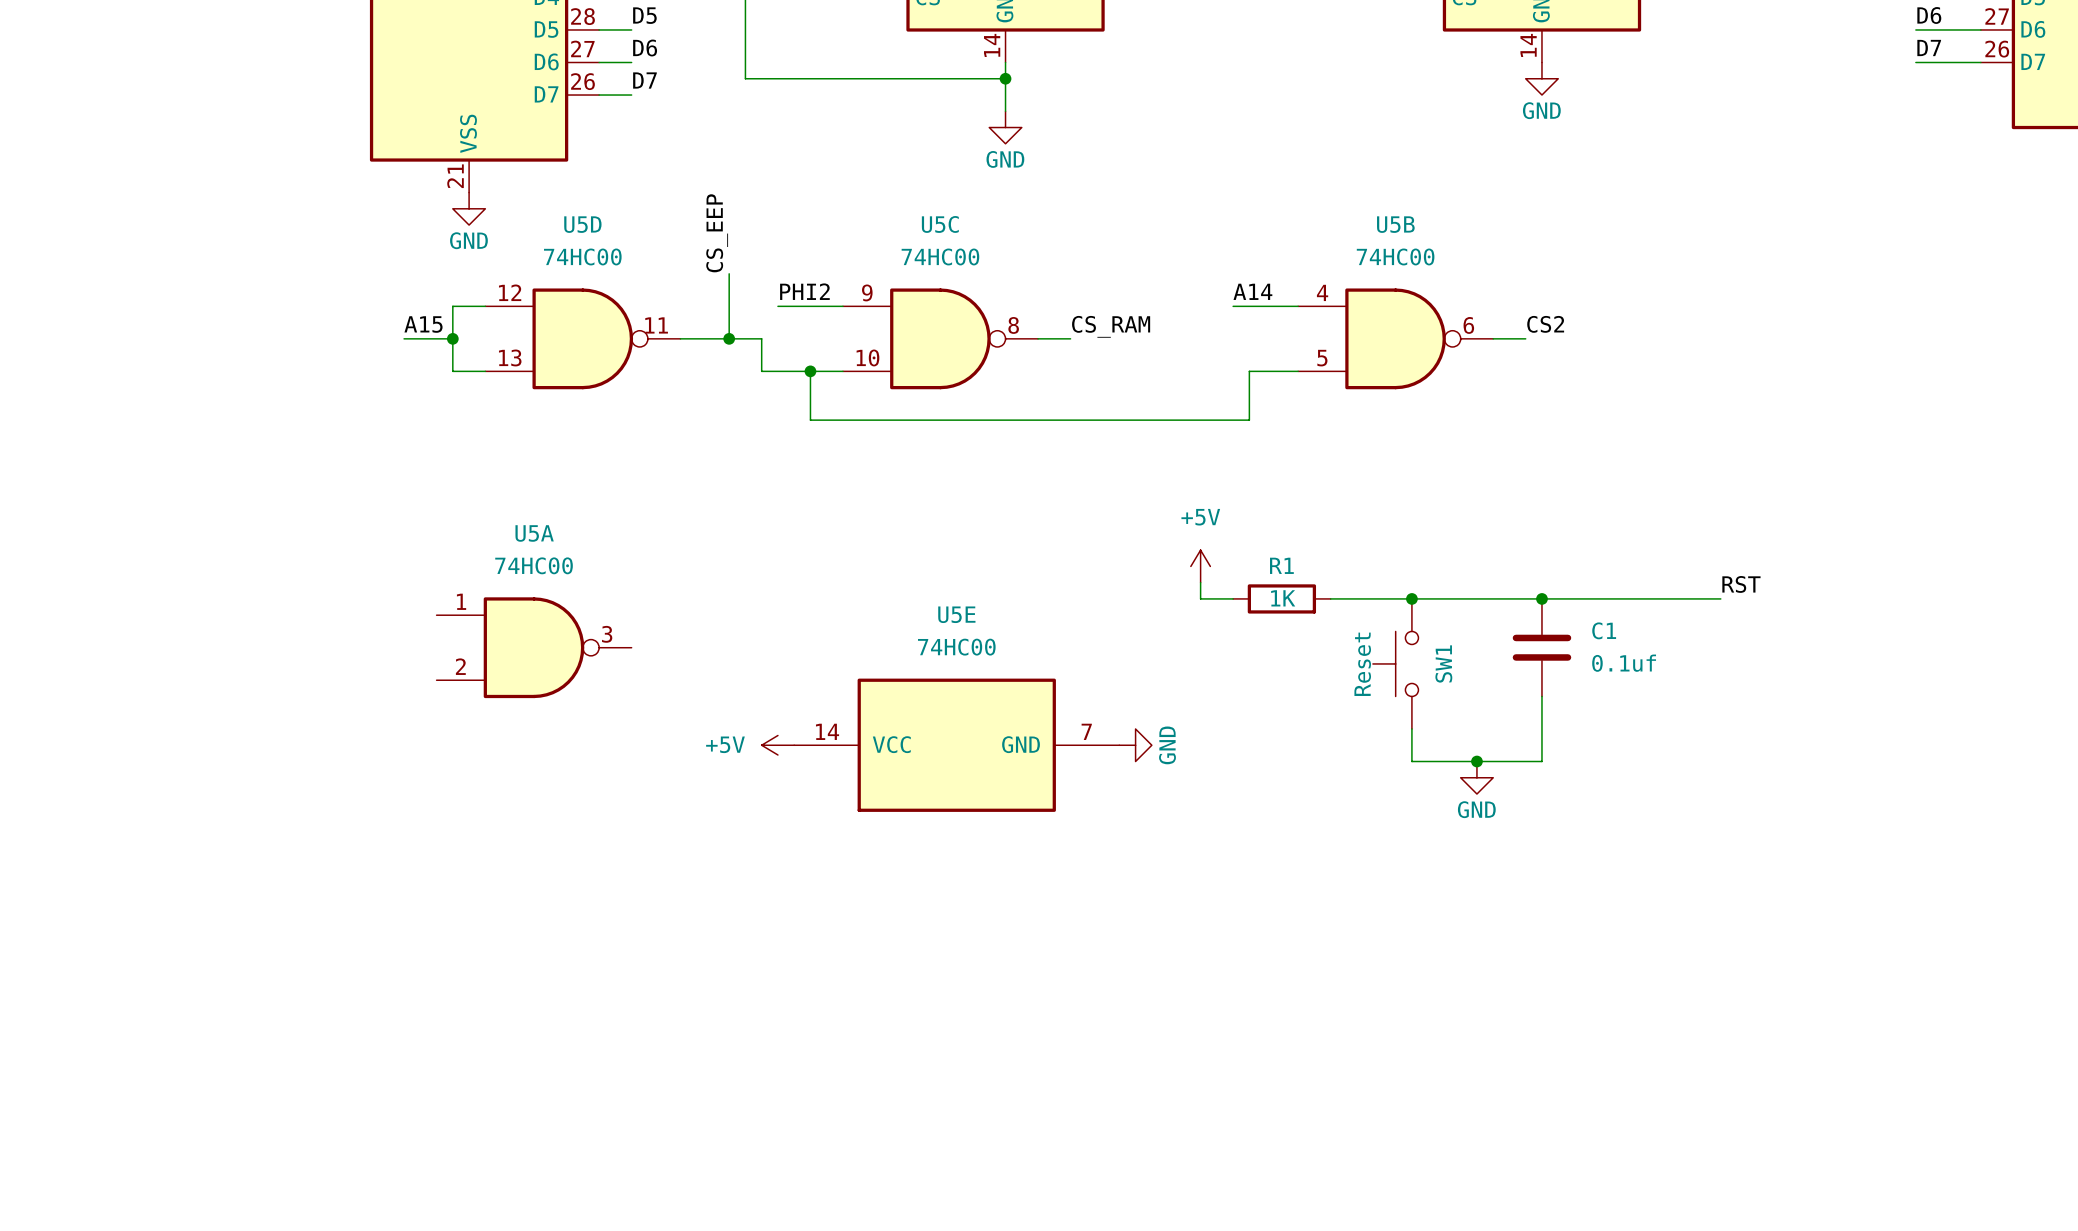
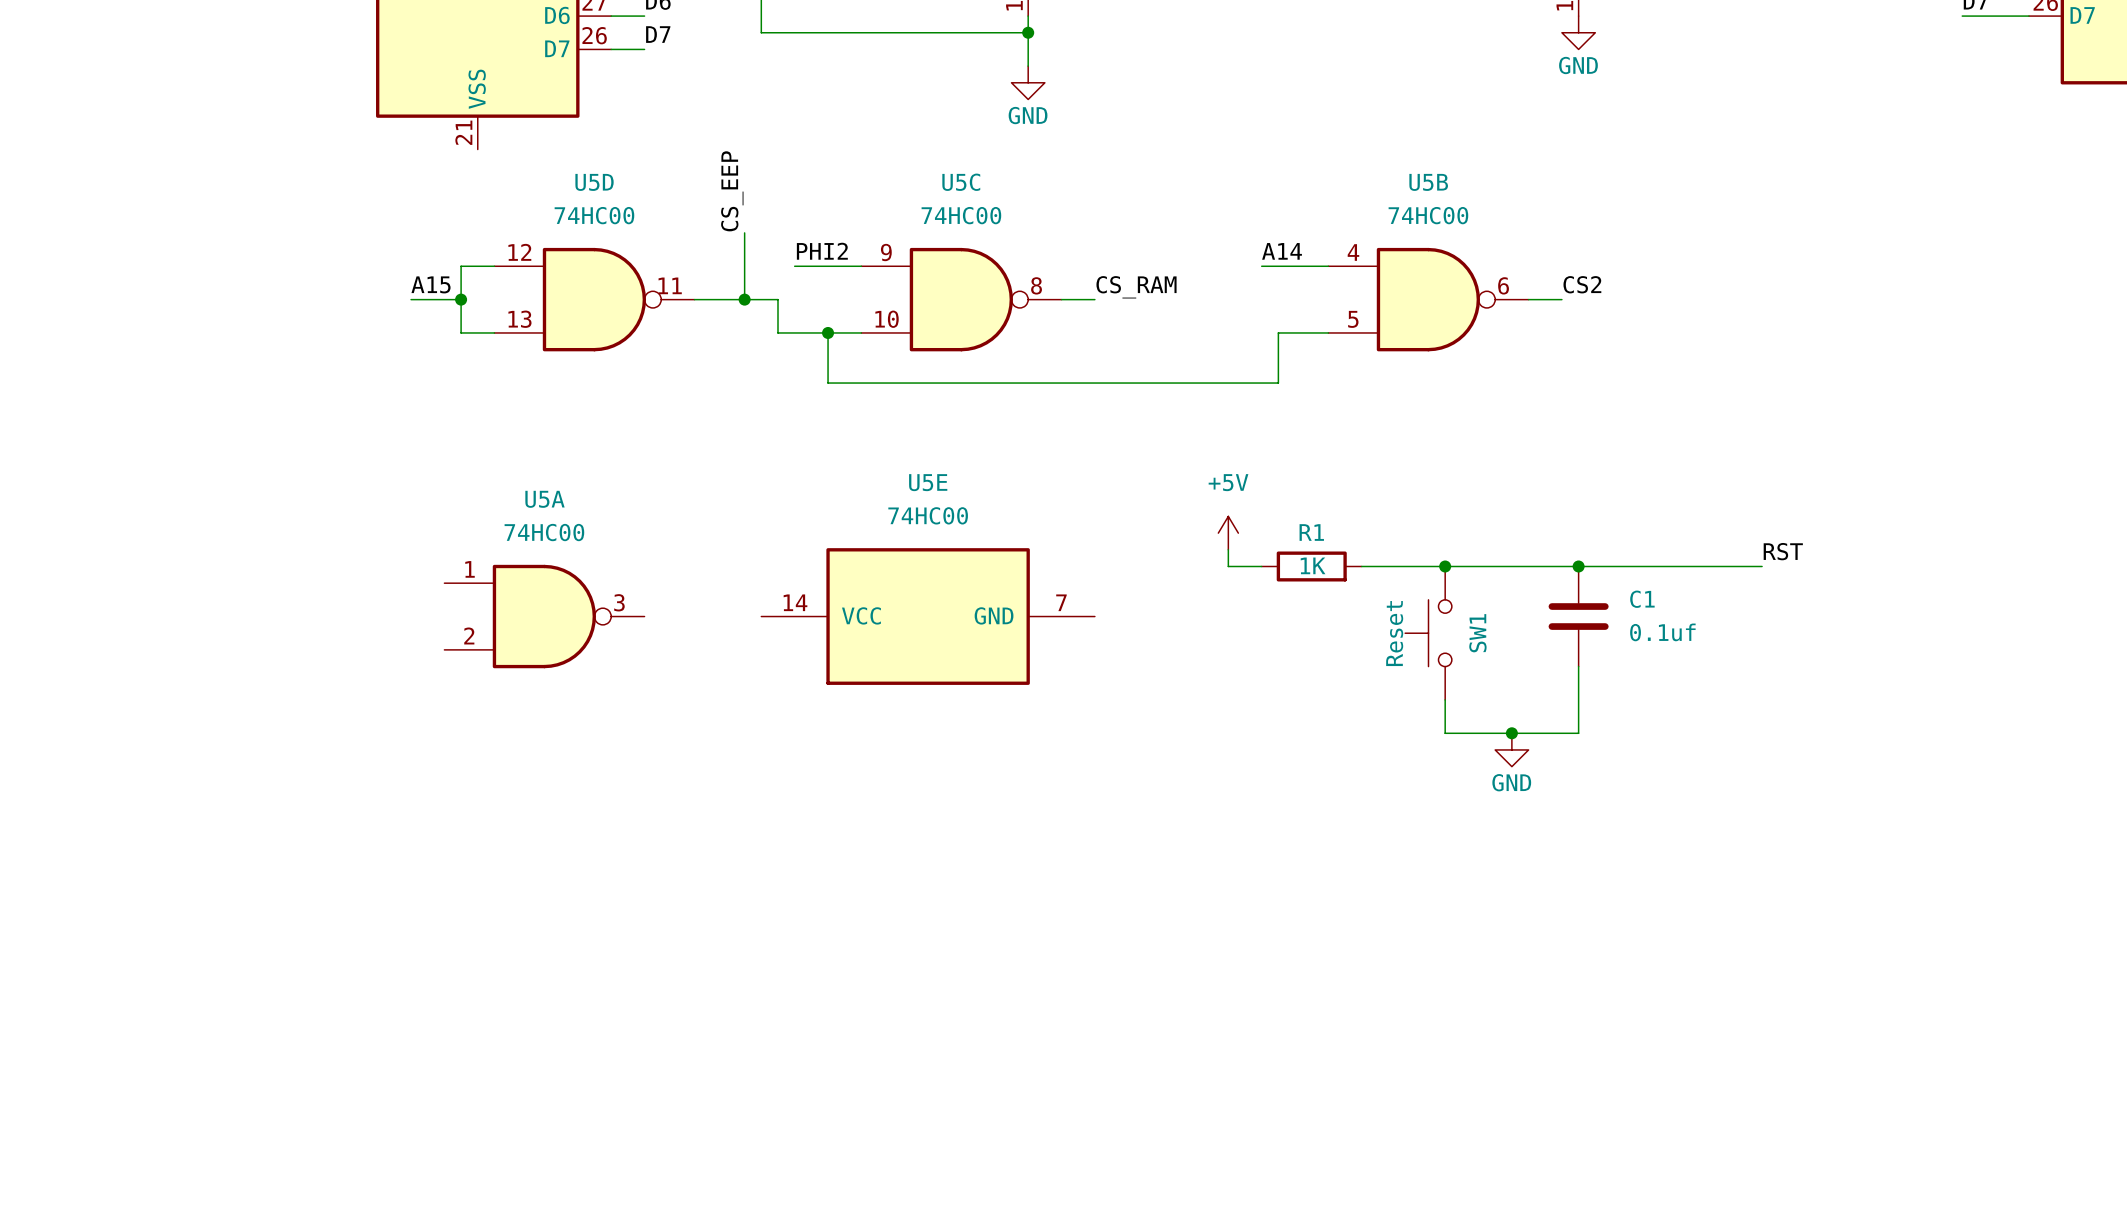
power symbol: GND (469, 208) -> none
power symbol: +5V (777, 745) -> none
U5E position: (956, 745) -> (928, 616)
power symbol: GND (1135, 745) -> none

